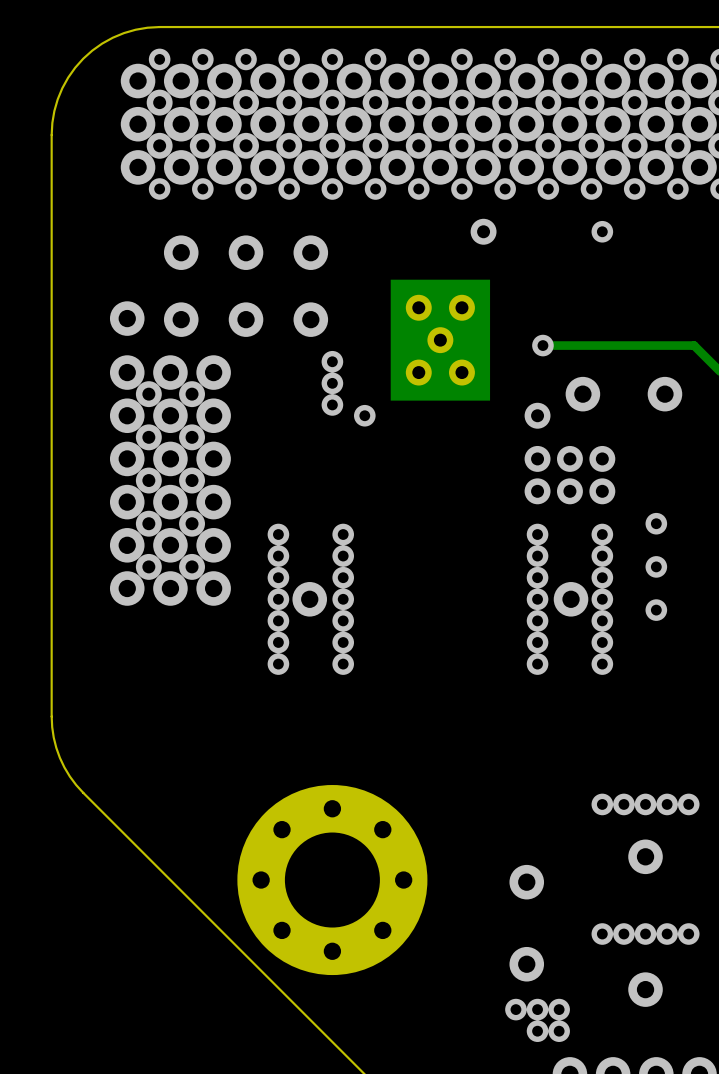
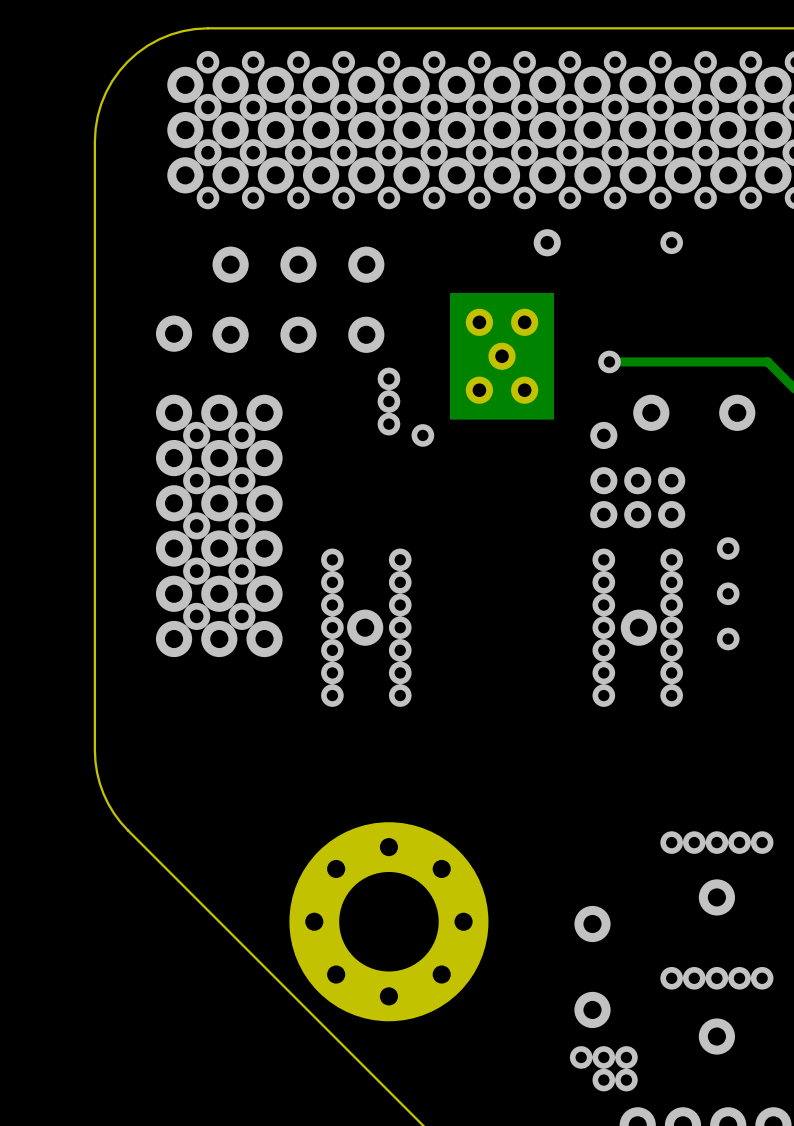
via: (127, 372) -> none
via: (170, 372) -> none
via: (213, 372) -> none
via: none -> (174, 412)
via: (148, 394) -> none
via: none -> (219, 412)
via: (192, 394) -> none
via: none -> (264, 412)
via: (127, 415) -> none
via: none -> (196, 435)
via: (170, 415) -> none
via: none -> (241, 435)
via: (213, 415) -> none
via: none -> (174, 458)
via: (148, 437) -> none
via: none -> (219, 458)
via: (192, 437) -> none
via: none -> (264, 458)
via: (127, 458) -> none
via: none -> (196, 480)
via: (170, 458) -> none
via: none -> (241, 480)
via: (213, 458) -> none
via: none -> (174, 503)
via: (148, 480) -> none
via: none -> (219, 503)
via: (192, 480) -> none
via: none -> (264, 503)
via: (127, 502) -> none
via: none -> (196, 525)
via: (170, 502) -> none
via: none -> (241, 525)
via: (213, 502) -> none
via: none -> (174, 548)
via: (148, 523) -> none
via: none -> (219, 548)
via: (192, 523) -> none
via: none -> (264, 548)
via: (127, 545) -> none
via: none -> (196, 571)
via: (170, 545) -> none
via: none -> (241, 571)
via: (213, 545) -> none
via: none -> (174, 593)
via: (148, 566) -> none
via: none -> (219, 593)
via: (192, 566) -> none
via: none -> (264, 593)
via: (127, 588) -> none
via: none -> (196, 616)
via: (170, 588) -> none
via: none -> (241, 616)
via: (213, 588) -> none
via: none -> (174, 639)
via: none -> (219, 639)
via: none -> (264, 639)

